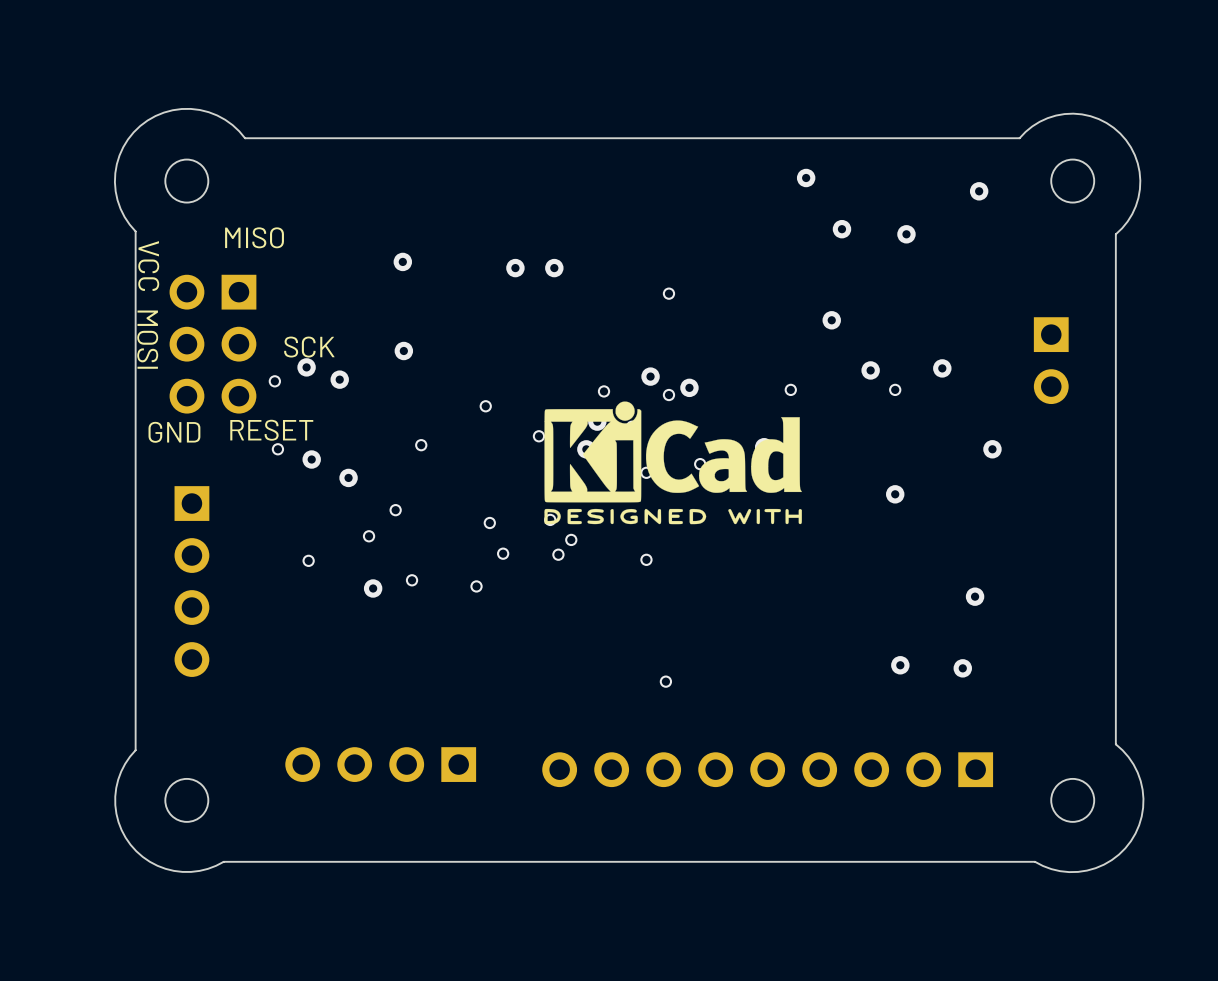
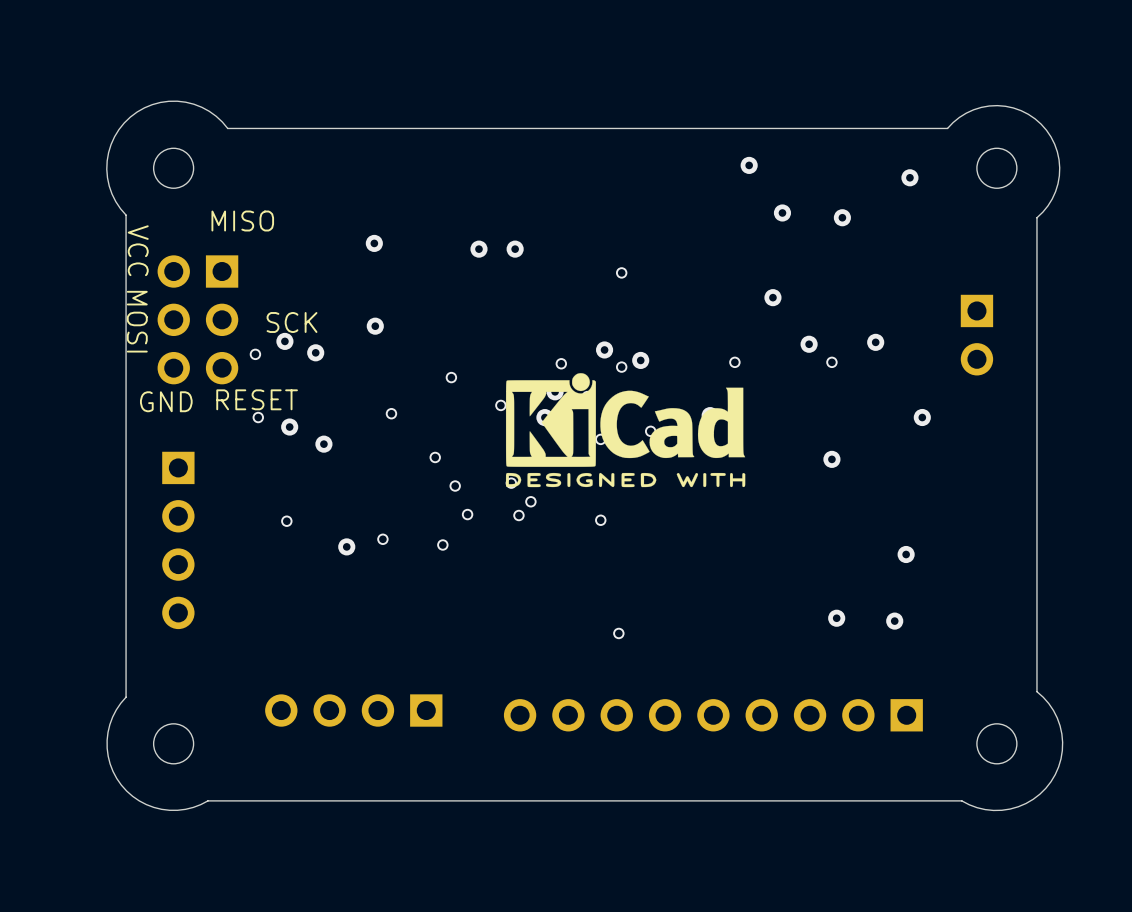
via: none -> (435, 457)
via: (395, 510) -> none
via: (369, 536) -> none

